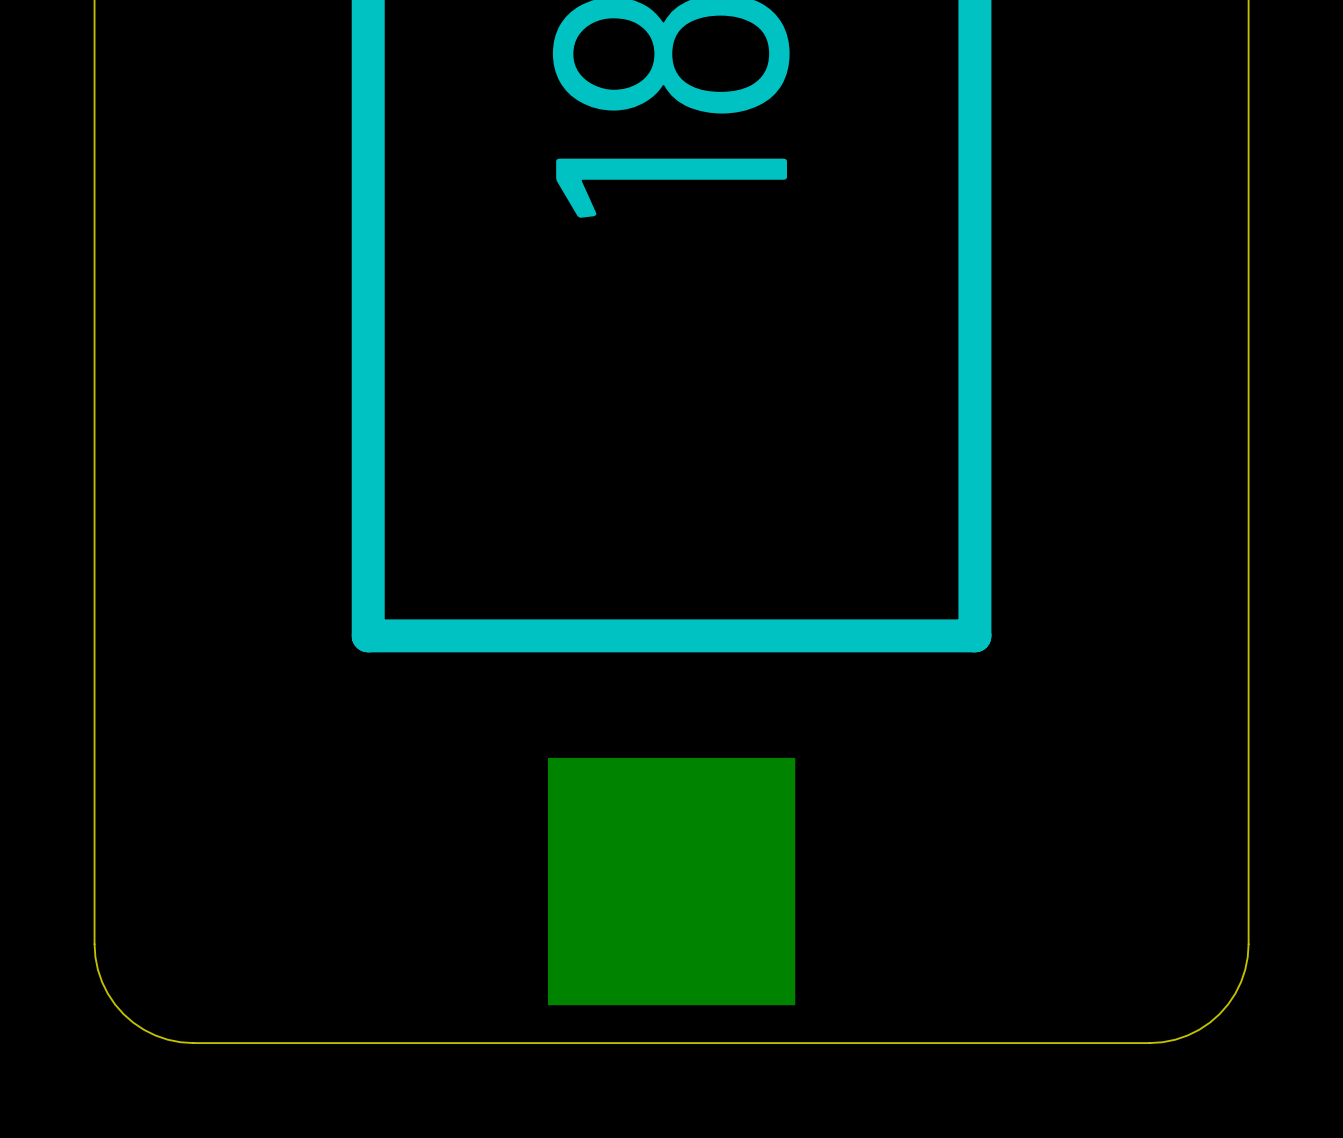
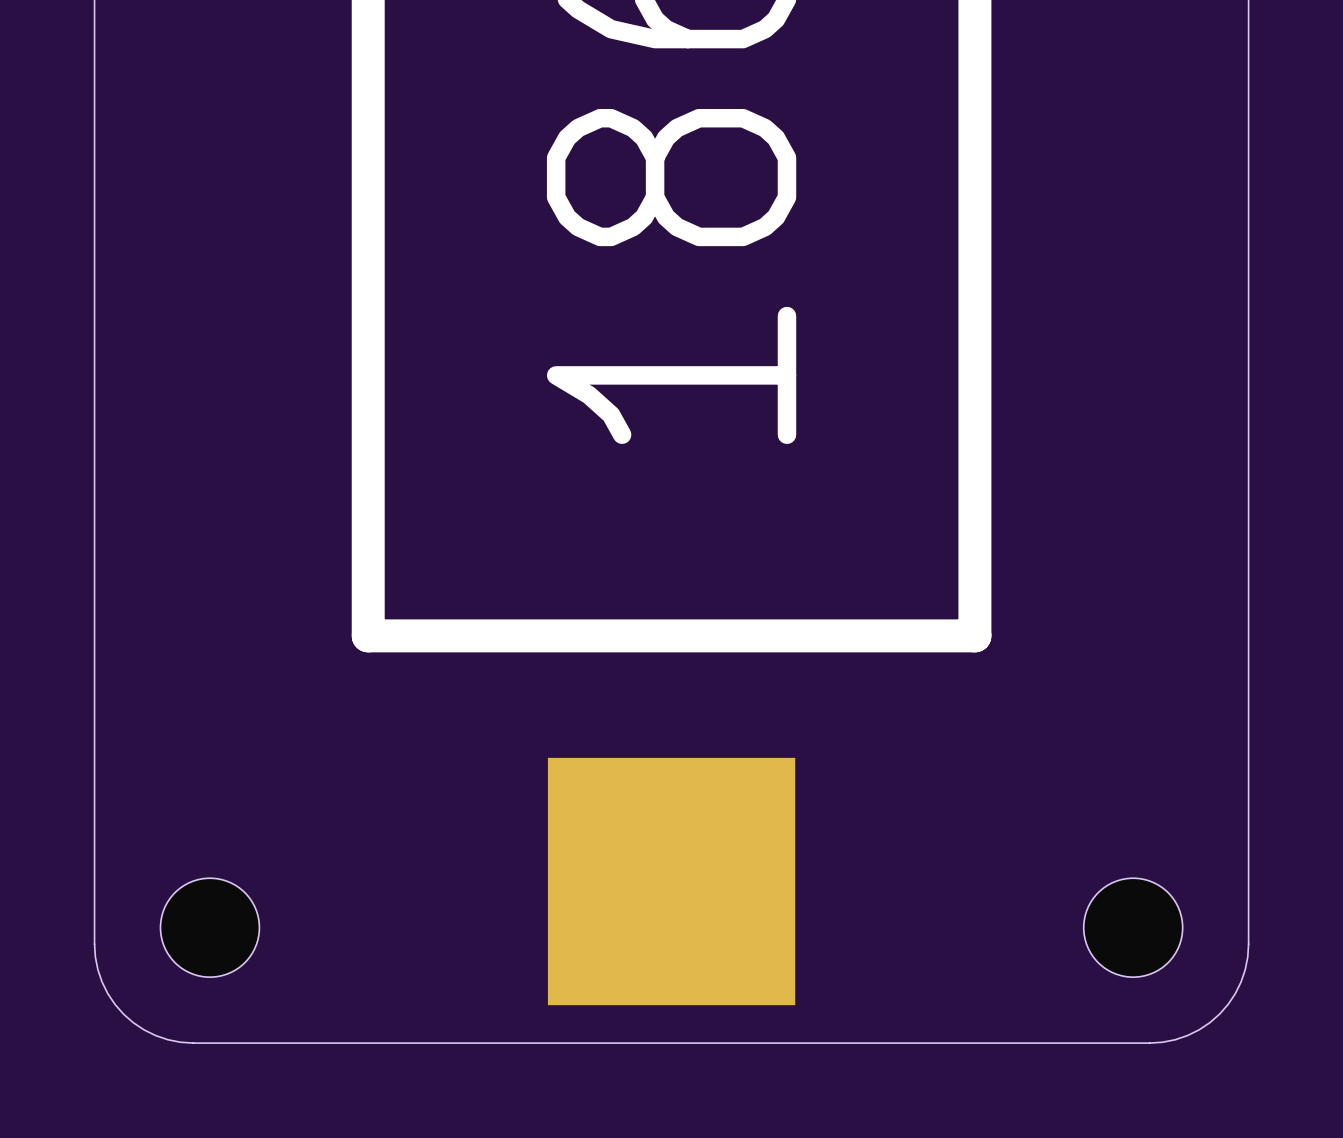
hole: none -> (209, 927)
hole: none -> (1133, 927)

